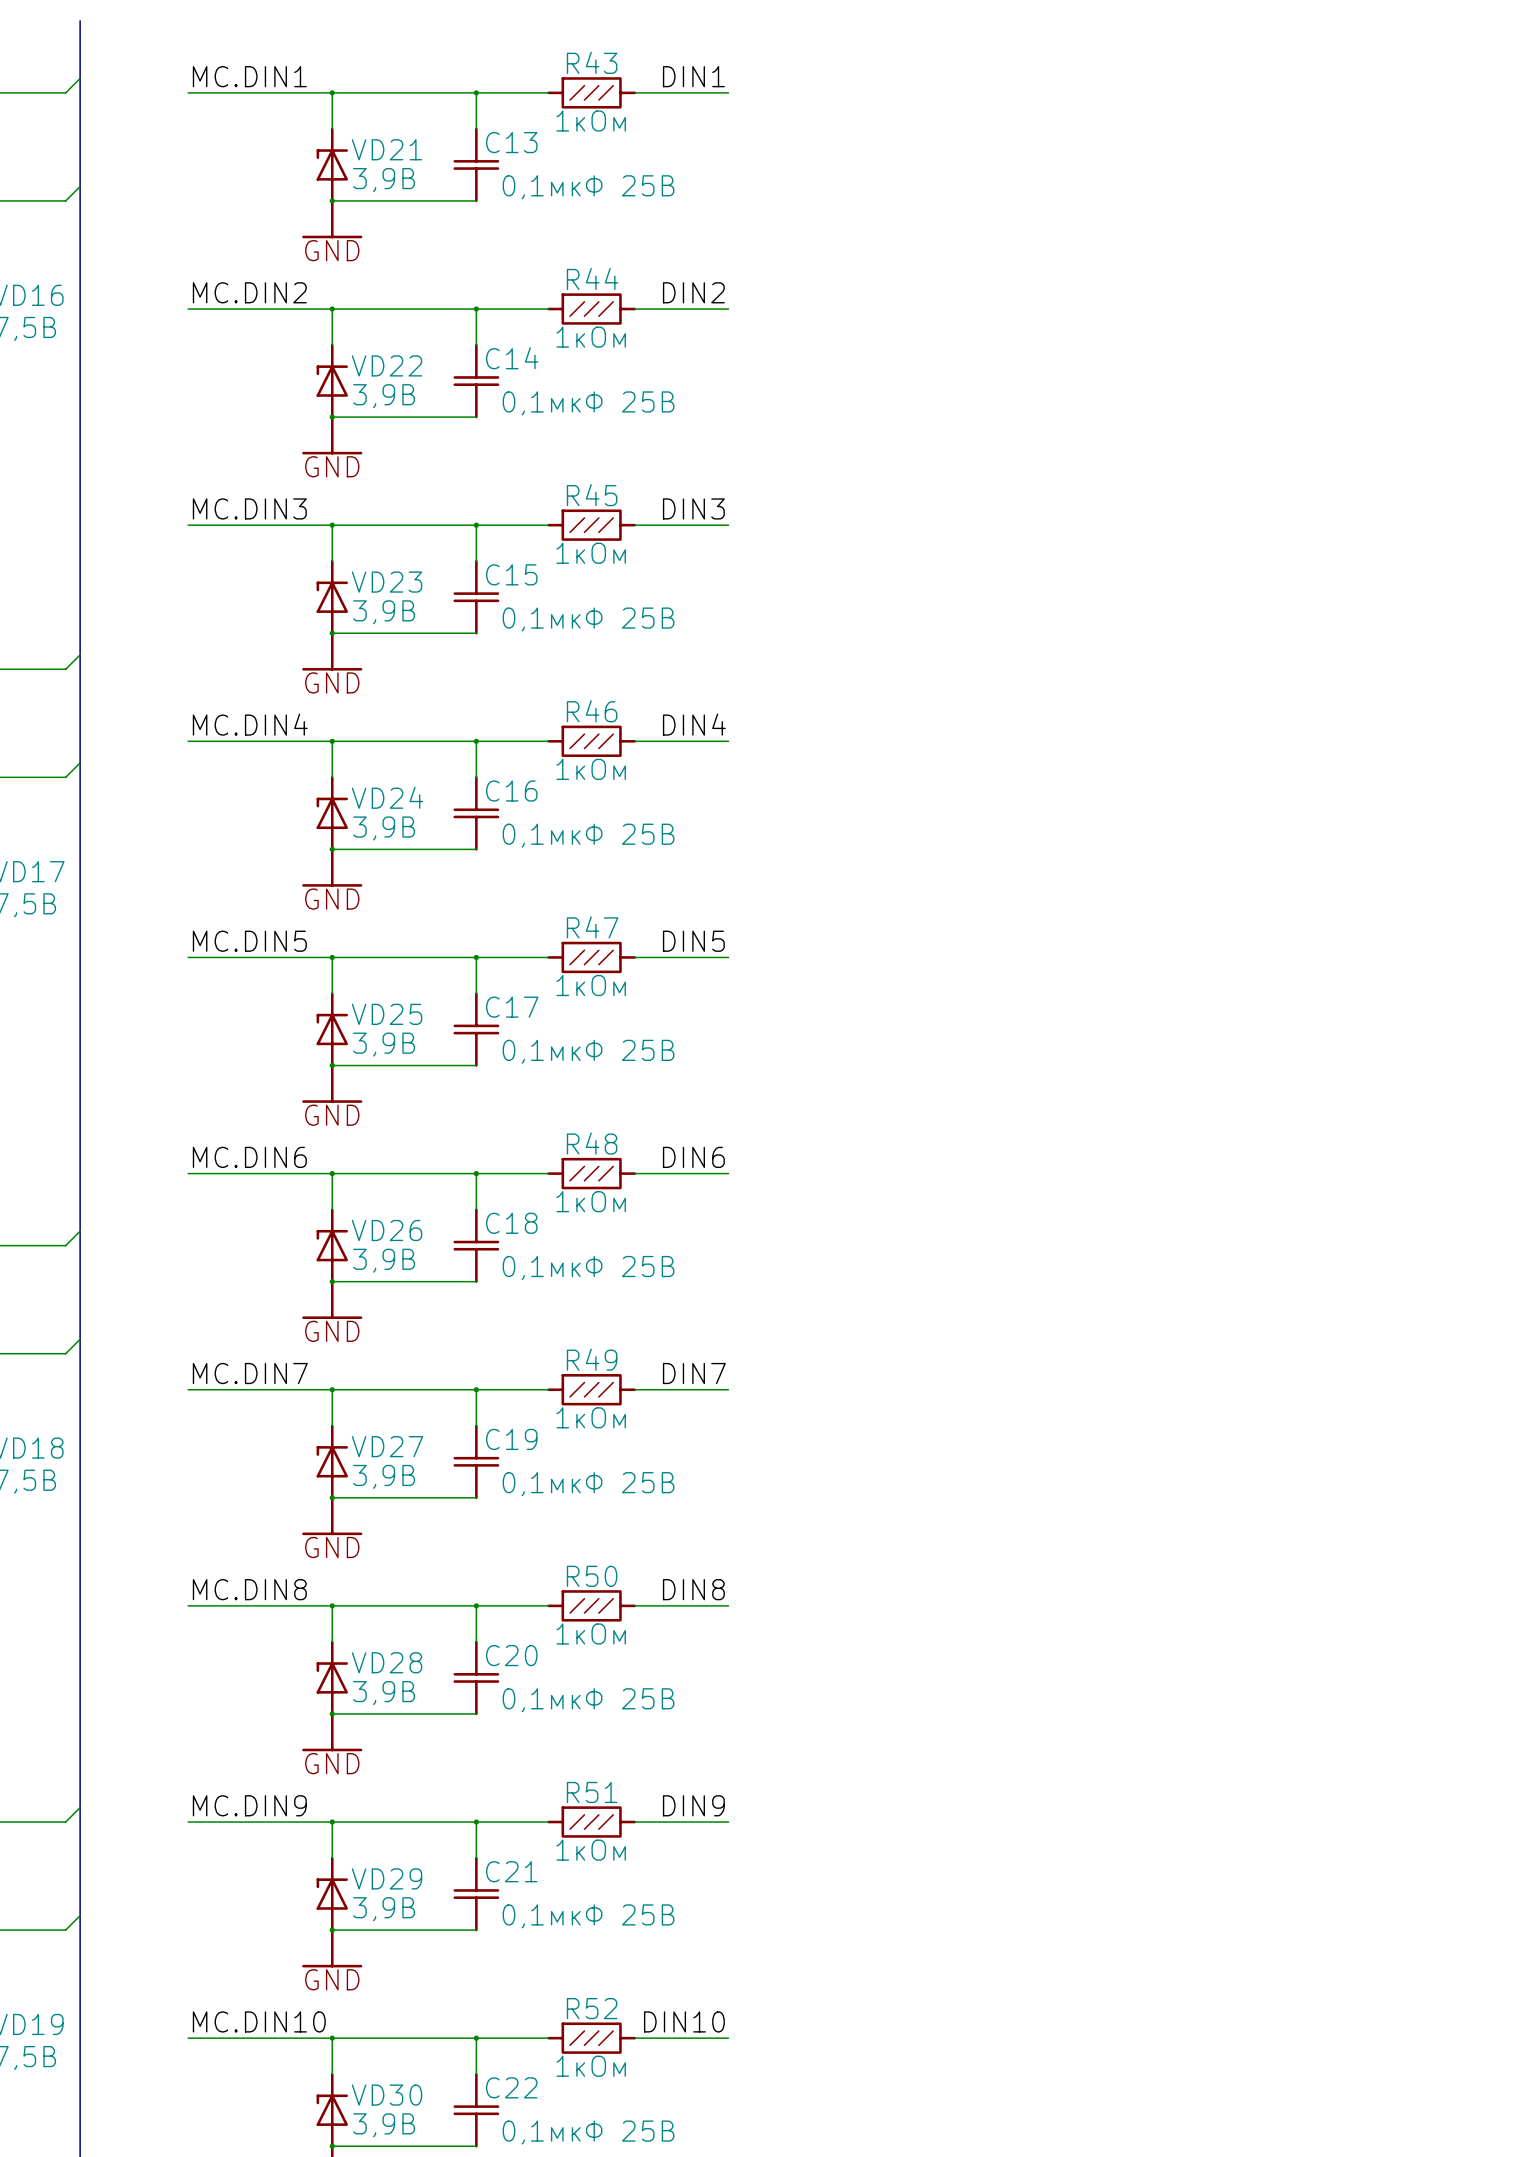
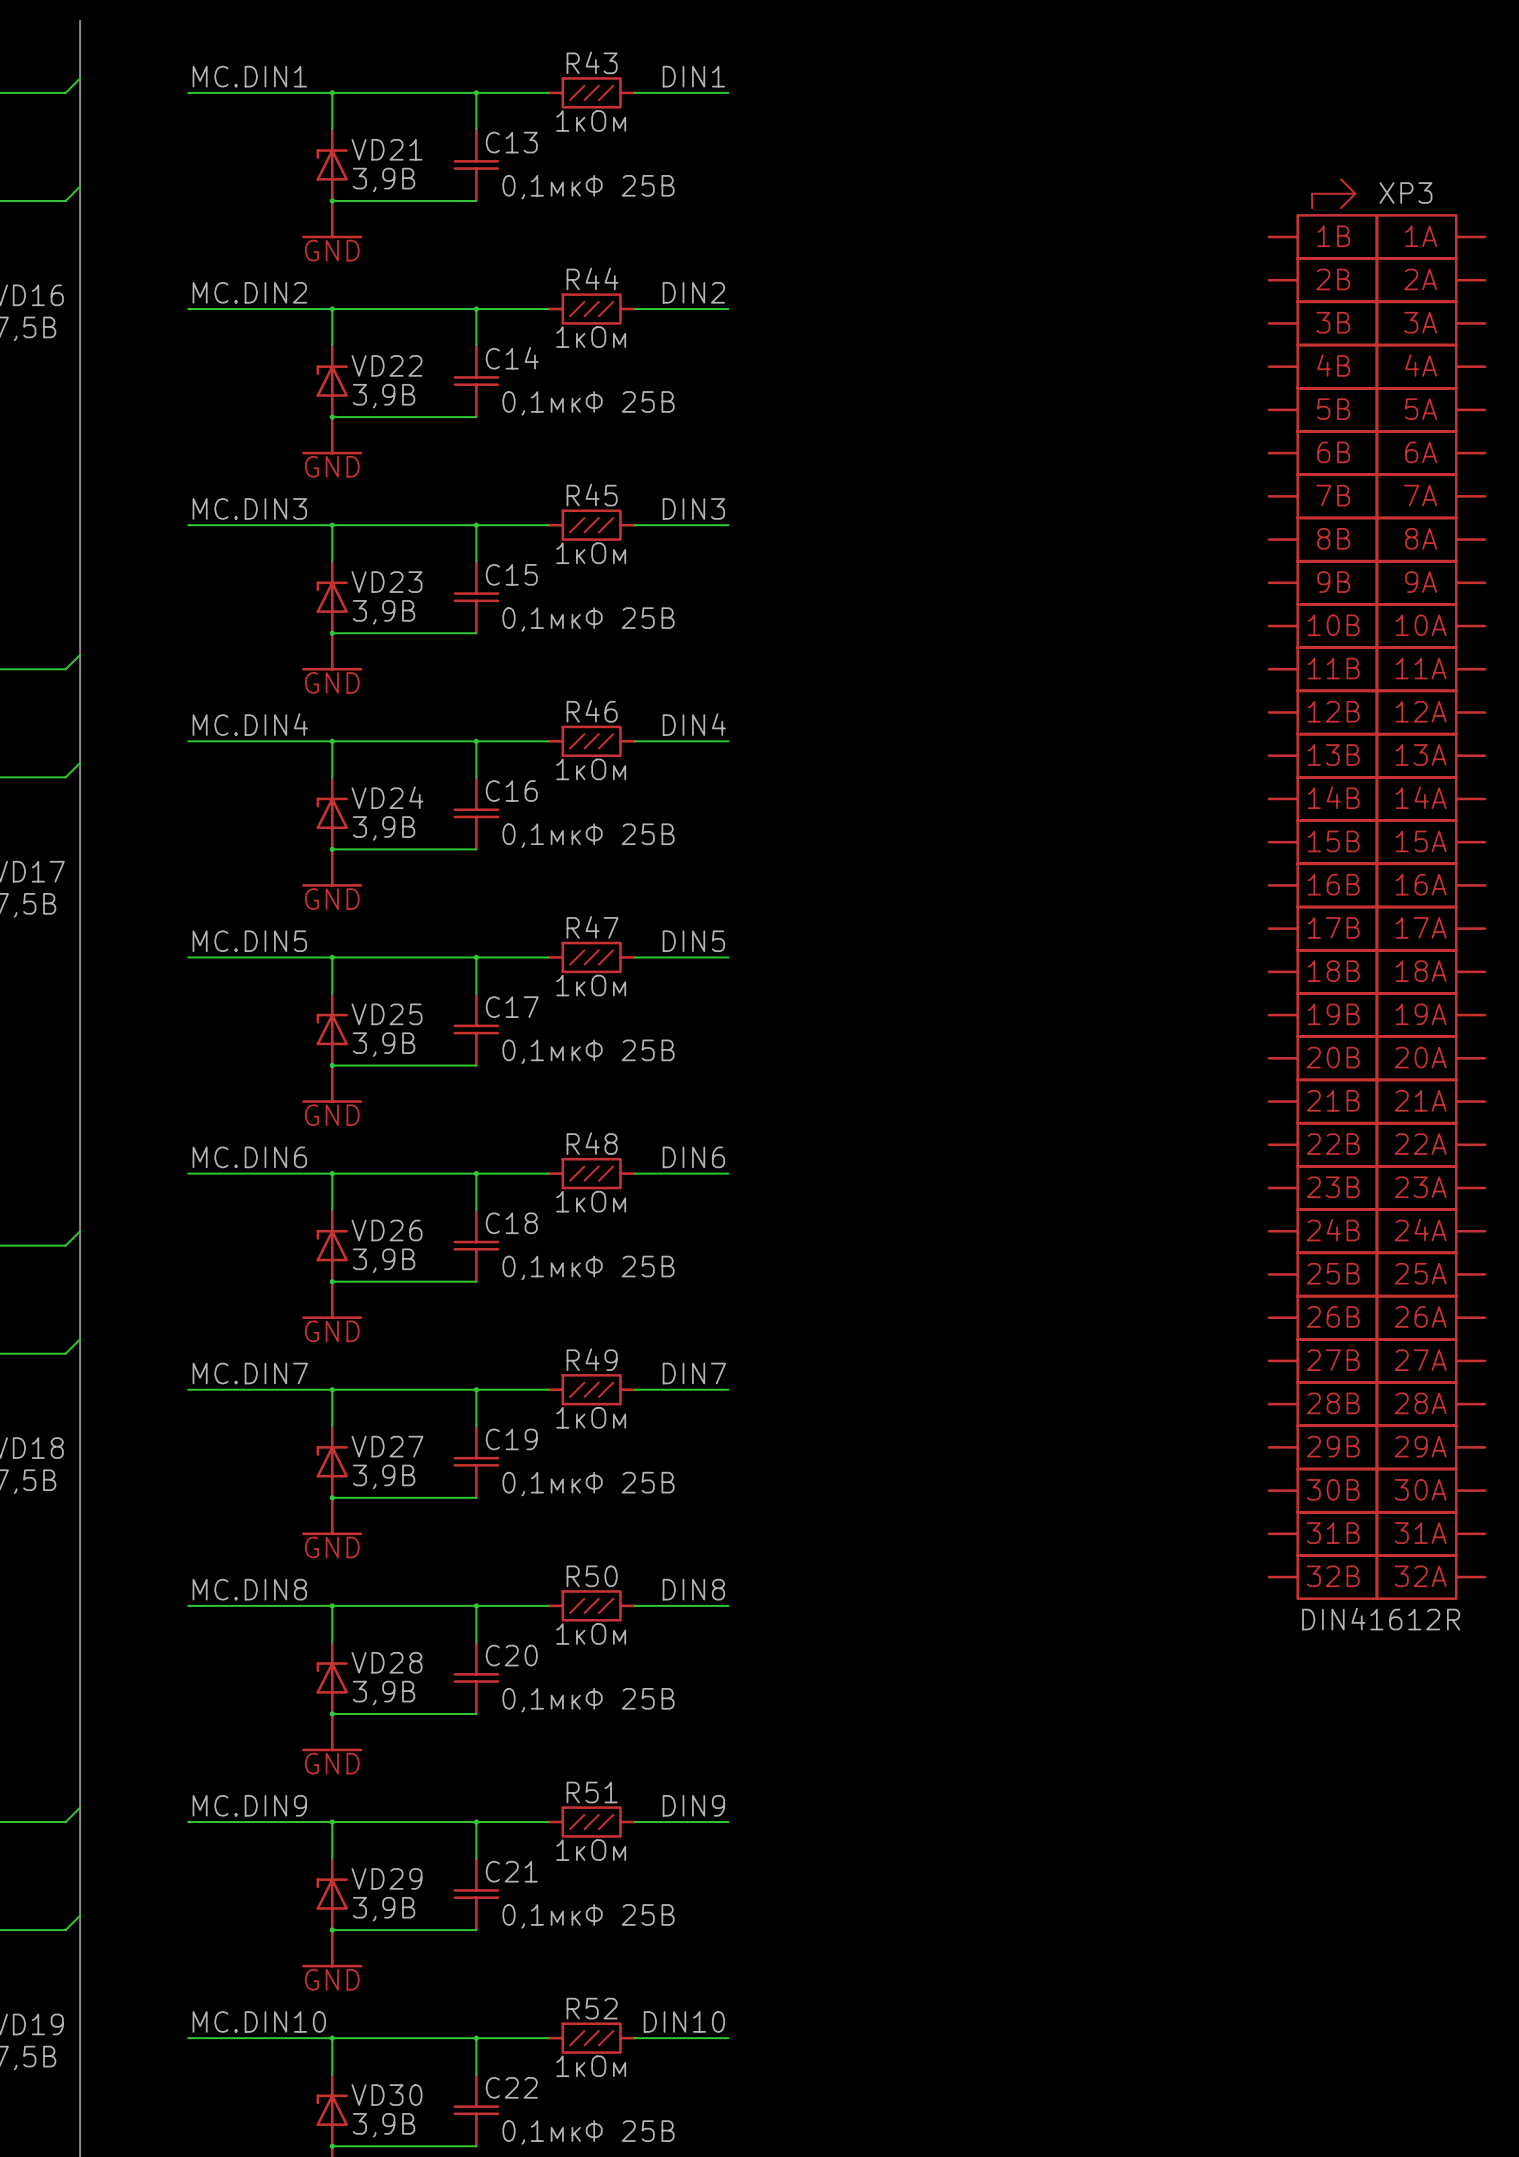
XP3: none -> (1376, 889)

